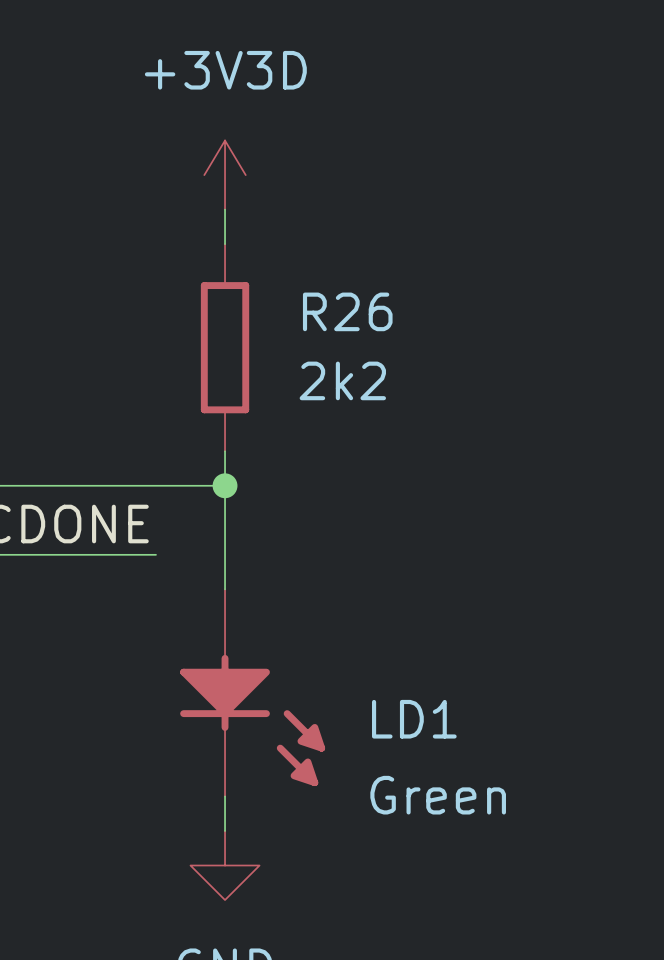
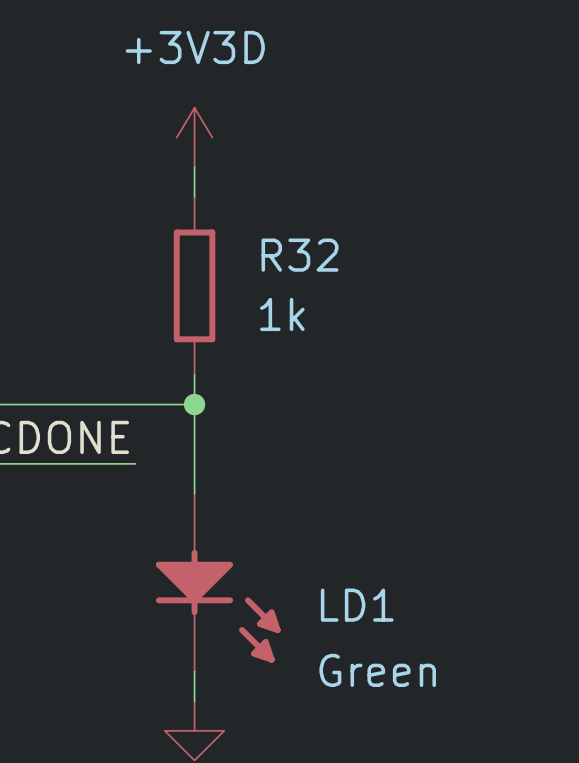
R26 name: R26 (347, 311) -> R32 (300, 255)
R26 text: 2k2 (342, 380) -> 1k (282, 314)

